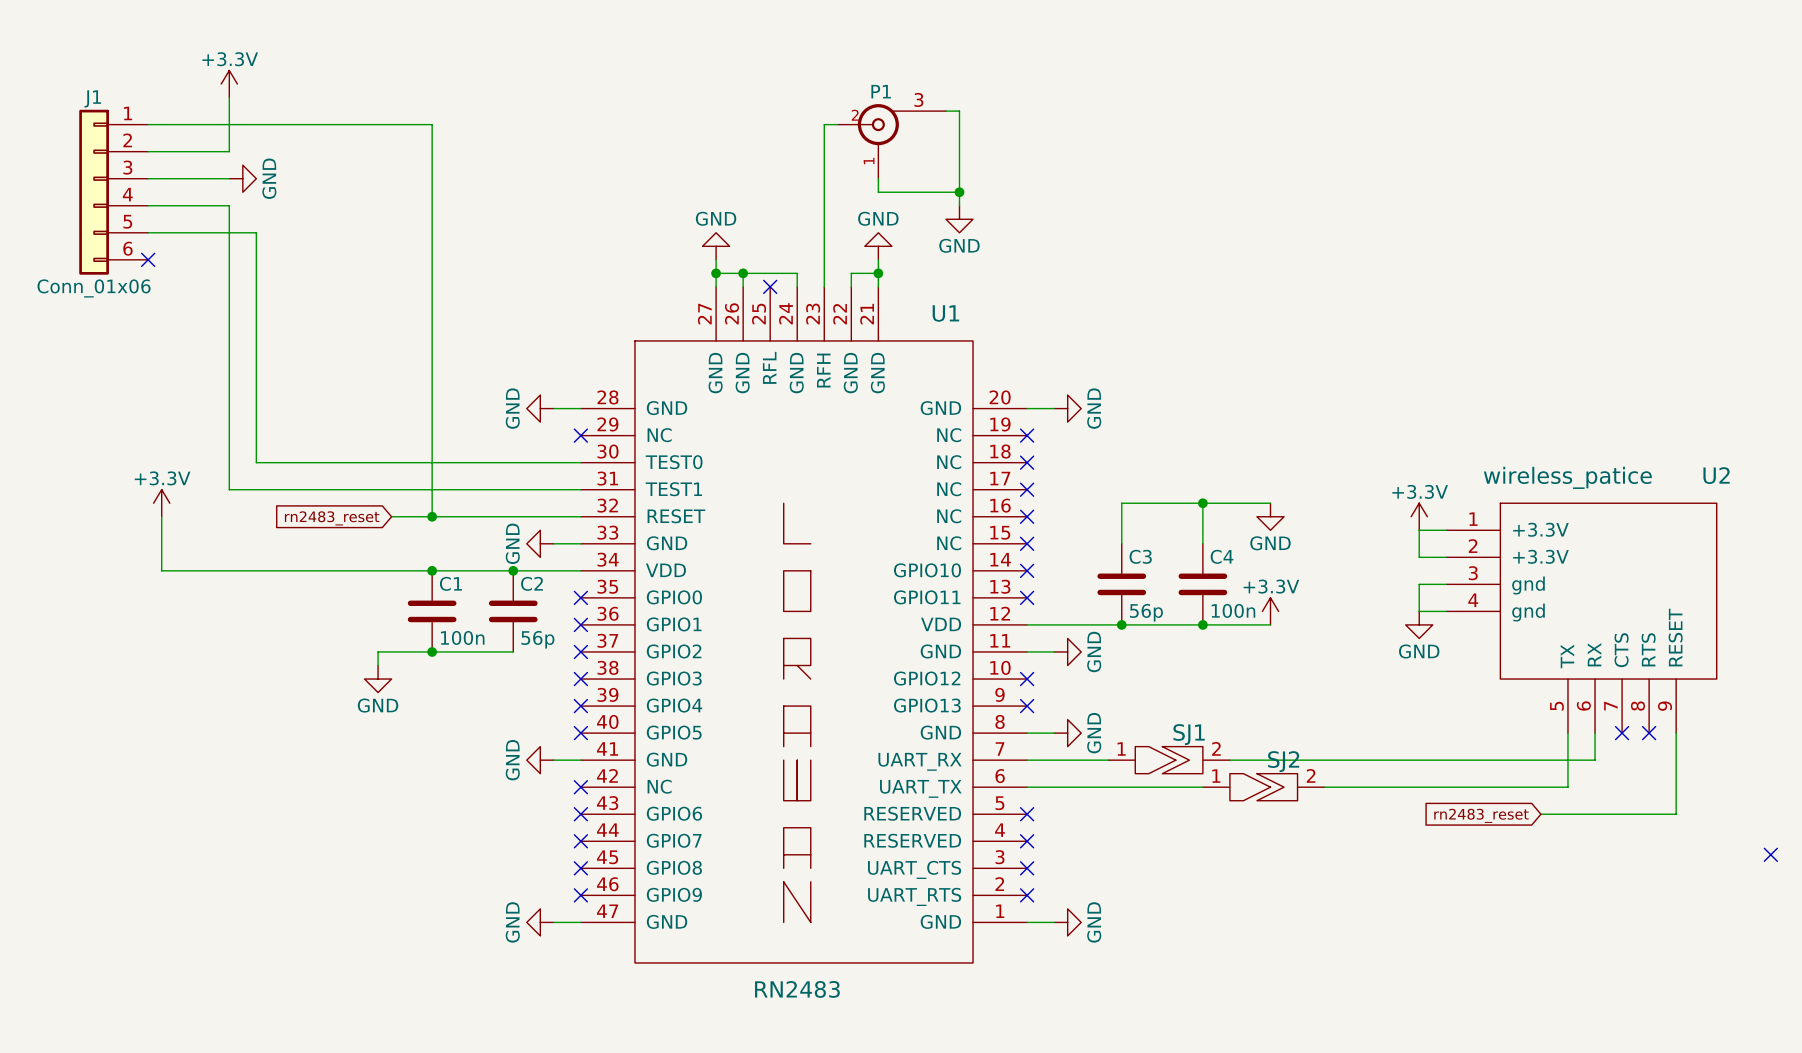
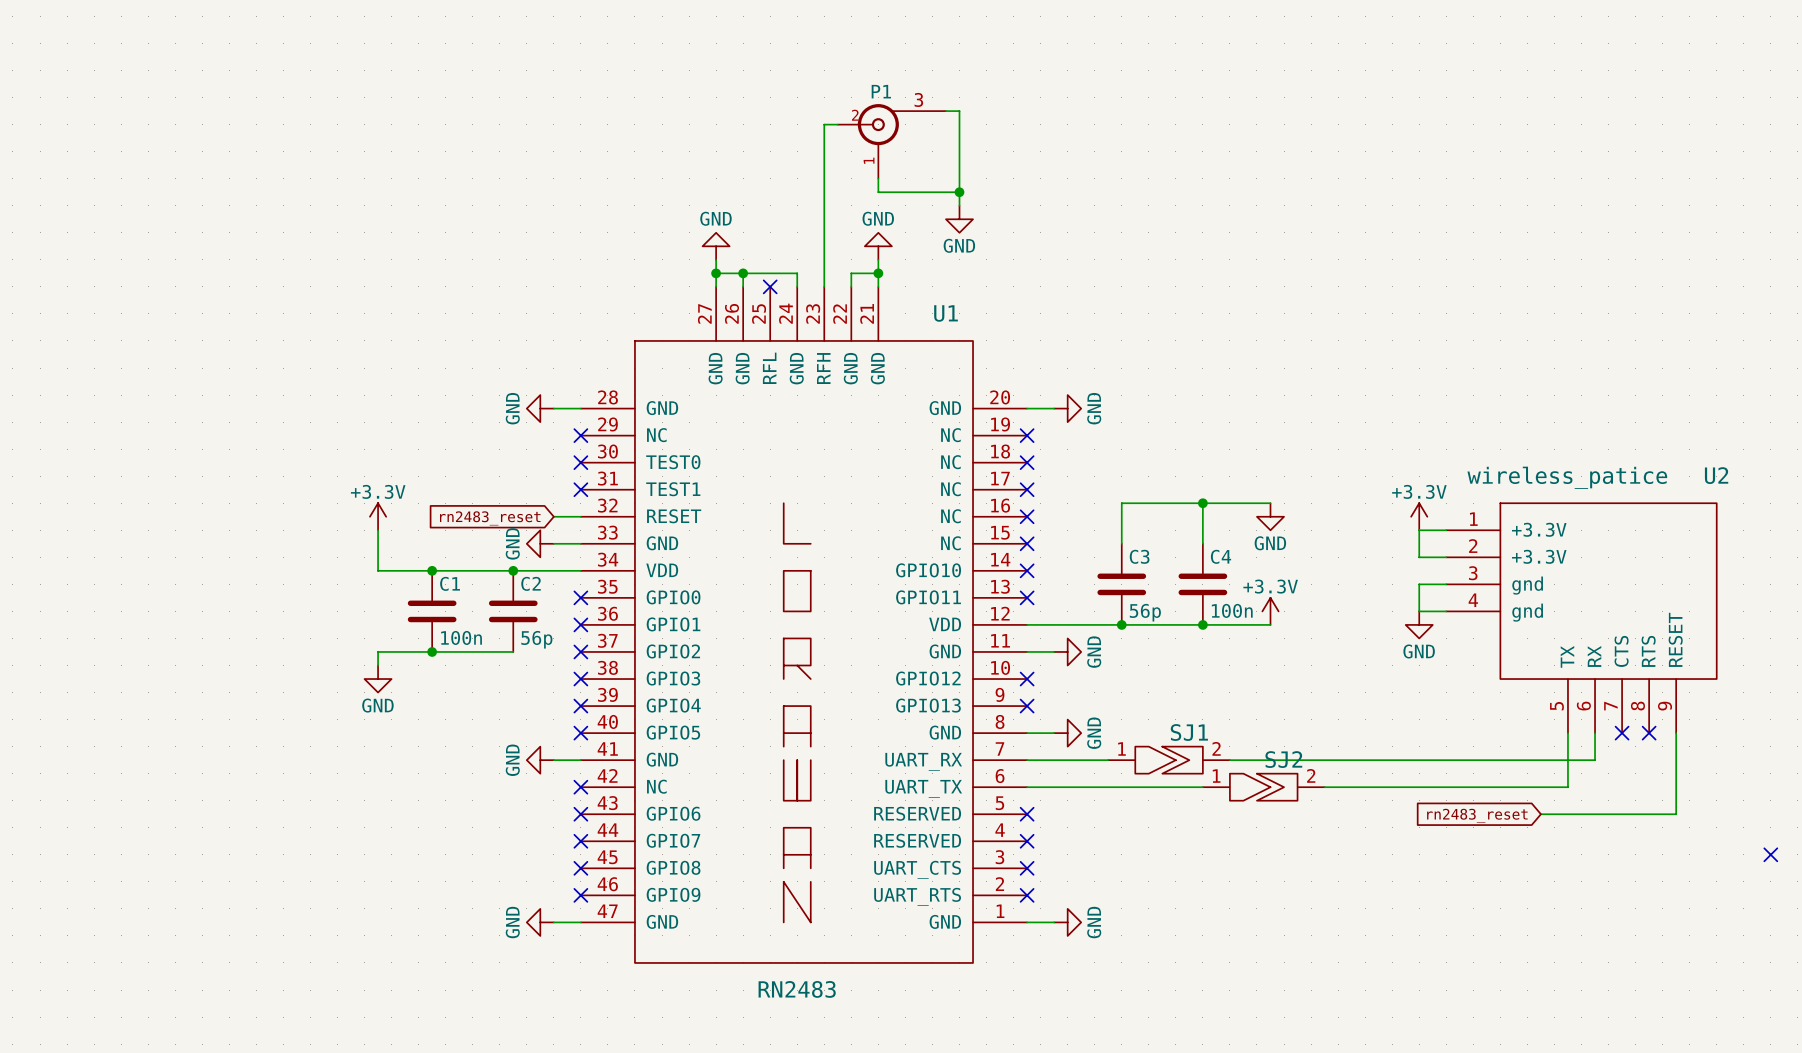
power symbol: +3.3V (229, 84) -> none
wire: (229, 97) (229, 151) (148, 151) -> none
wire: (148, 124) (432, 124) (432, 516) -> none
wire: (148, 178) (229, 178) -> none
power symbol: GND (242, 178) -> none
J1: Conn_01x06 (113, 192) -> none
wire: (148, 205) (229, 205) (229, 489) (580, 489) -> none
wire: (148, 232) (256, 232) (256, 462) (580, 462) -> none
no-connect mark: (148, 259) -> none
no-connect mark: none -> (580, 462)
no-connect mark: none -> (580, 489)
power symbol position: +3.3V (161, 503) -> +3.3V (378, 516)
wire: (161, 516) (161, 570) (378, 570) -> (378, 530) (378, 570)
wire: (391, 516) (553, 516) -> none
junction: (432, 516) -> none
global label position: rn2483_reset (332, 518) -> rn2483_reset (490, 518)

